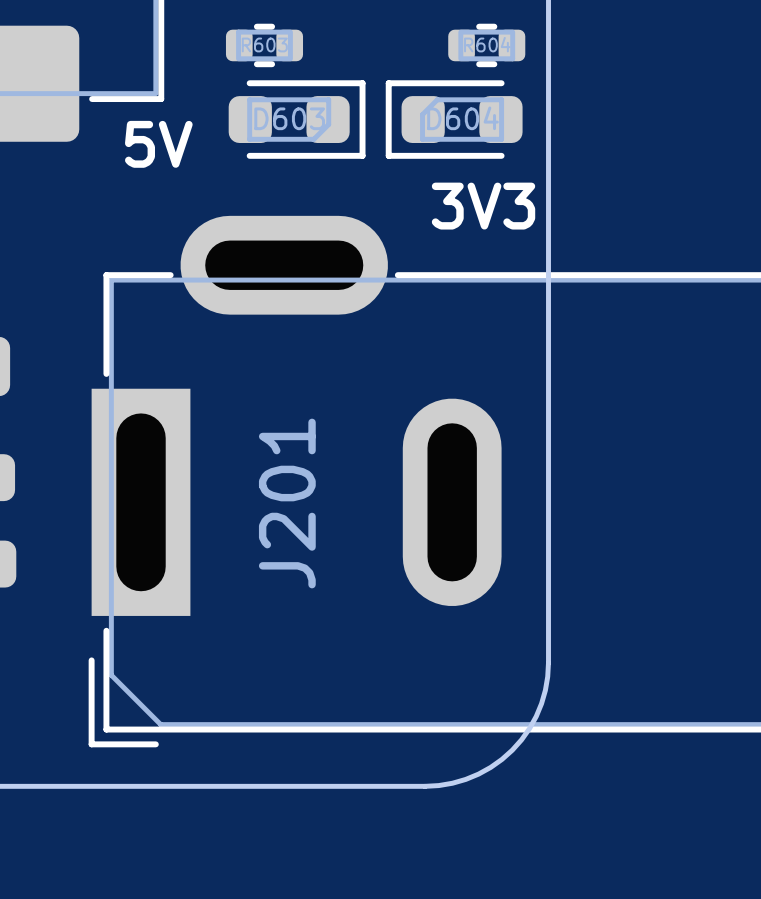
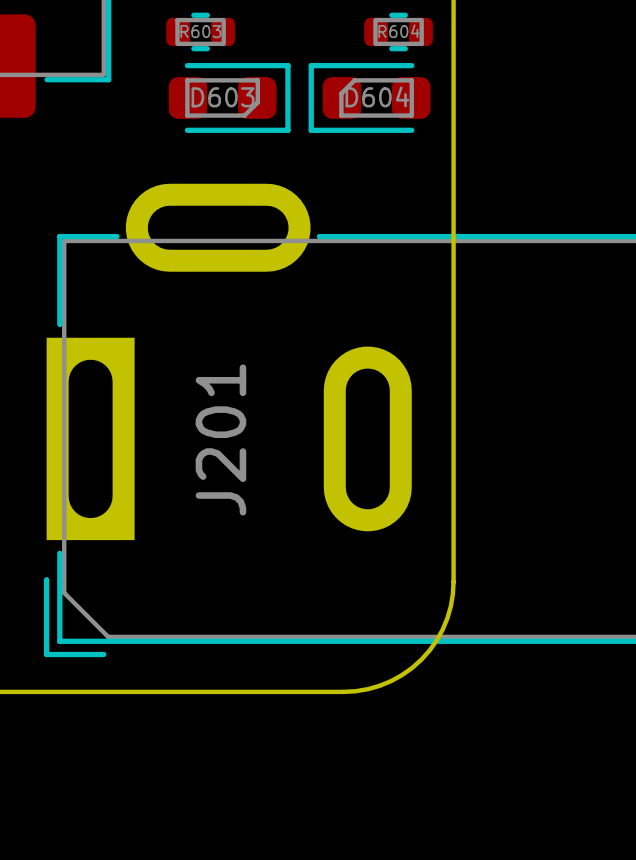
text: 5V (158, 144) -> none
text: 3V3 (483, 206) -> none

